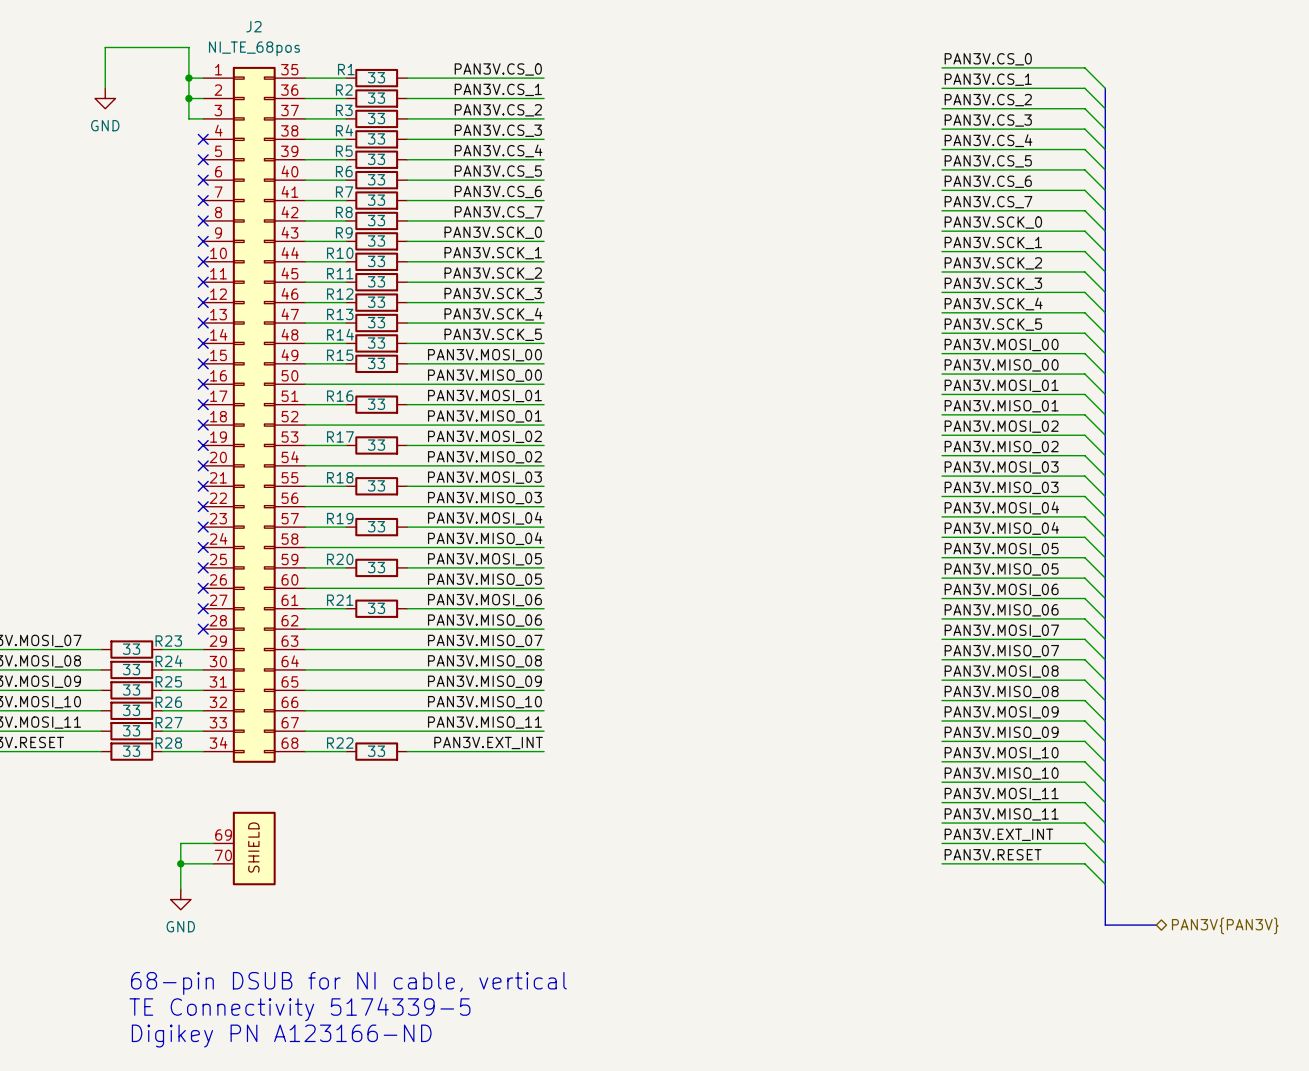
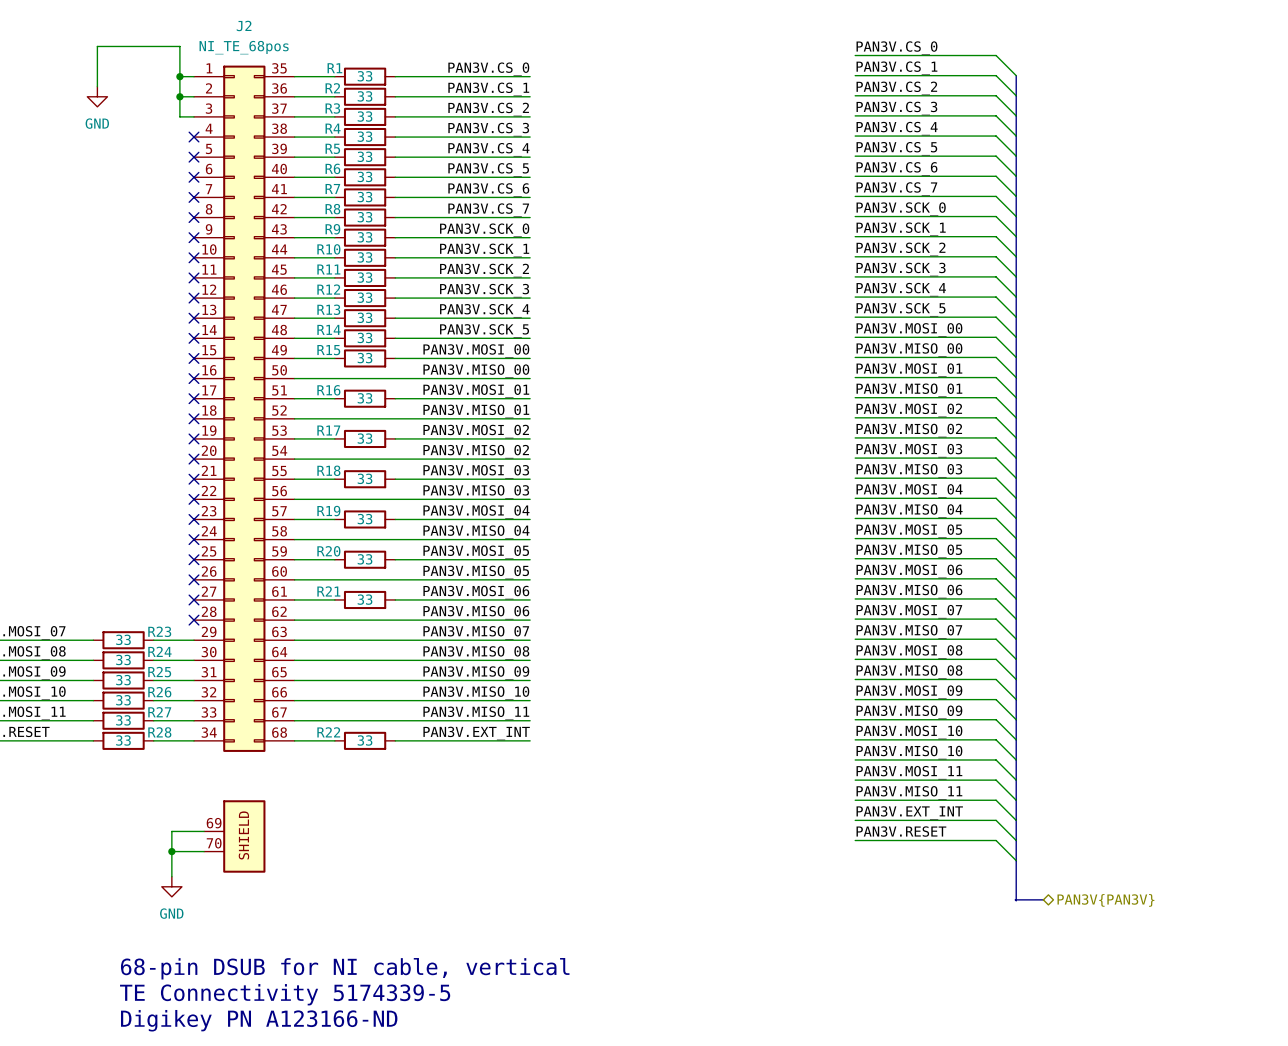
label position: PAN3V.CS_0 (988, 59) -> PAN3V.CS_0 (896, 48)
wire: (942, 67) (1084, 67) (1105, 88) -> (855, 55) (996, 55) (1016, 75)
bus: none -> (1016, 75) (1016, 900)
label position: PAN3V.CS_1 (988, 79) -> PAN3V.CS_1 (896, 68)
wire: (942, 88) (1084, 88) (1105, 108) -> (855, 75) (996, 75) (1016, 95)
bus: (1105, 88) (1105, 925) (1156, 925) -> none
label position: PAN3V.CS_2 (988, 100) -> PAN3V.CS_2 (896, 88)
wire: (942, 108) (1084, 108) (1105, 129) -> (855, 95) (996, 95) (1016, 115)
label position: PAN3V.CS_3 (988, 120) -> PAN3V.CS_3 (896, 108)
wire: (942, 129) (1084, 129) (1105, 149) -> (855, 115) (996, 115) (1016, 136)
label position: PAN3V.CS_4 (988, 140) -> PAN3V.CS_4 (897, 128)
wire: (942, 149) (1084, 149) (1105, 169) -> (855, 136) (996, 136) (1016, 156)
label position: PAN3V.CS_5 (988, 161) -> PAN3V.CS_5 (896, 148)
wire: (942, 169) (1084, 169) (1105, 190) -> (855, 156) (996, 156) (1016, 176)
label position: PAN3V.CS_6 (988, 181) -> PAN3V.CS_6 (896, 168)
wire: (942, 190) (1084, 190) (1105, 210) -> (855, 176) (996, 176) (1016, 196)
label position: PAN3V.CS_7 (988, 202) -> PAN3V.CS_7 (896, 188)
wire: (942, 210) (1084, 210) (1105, 231) -> (855, 196) (996, 196) (1016, 216)
label position: PAN3V.SCK_0 (993, 222) -> PAN3V.SCK_0 (901, 209)
wire: (942, 231) (1084, 231) (1105, 251) -> (855, 216) (996, 216) (1016, 236)
label position: PAN3V.SCK_1 (993, 242) -> PAN3V.SCK_1 (901, 229)
wire: (942, 251) (1084, 251) (1105, 271) -> (855, 236) (996, 236) (1016, 256)
label position: PAN3V.SCK_2 (993, 263) -> PAN3V.SCK_2 (900, 249)
wire: (942, 271) (1084, 271) (1105, 292) -> (855, 256) (996, 256) (1016, 276)
label position: PAN3V.SCK_3 (993, 283) -> PAN3V.SCK_3 (901, 269)
wire: (942, 292) (1084, 292) (1105, 312) -> (855, 276) (996, 276) (1016, 297)
label position: PAN3V.SCK_4 (993, 303) -> PAN3V.SCK_4 (901, 289)
wire: (942, 312) (1084, 312) (1105, 333) -> (855, 297) (996, 297) (1016, 317)
label position: PAN3V.SCK_5 (993, 324) -> PAN3V.SCK_5 (901, 309)
wire: (942, 333) (1084, 333) (1105, 353) -> (855, 317) (996, 317) (1016, 337)
label position: PAN3V.MOSI_00 (1001, 345) -> PAN3V.MOSI_00 (909, 329)
wire: (942, 353) (1084, 353) (1105, 374) -> (855, 337) (996, 337) (1016, 357)
label position: PAN3V.MISO_00 (1001, 365) -> PAN3V.MISO_00 (909, 349)
wire: (942, 374) (1084, 374) (1105, 394) -> (855, 357) (996, 357) (1016, 377)
label position: PAN3V.MOSI_01 (1001, 385) -> PAN3V.MOSI_01 (909, 370)
wire: (942, 394) (1084, 394) (1105, 414) -> (855, 377) (996, 377) (1016, 397)
label position: PAN3V.MISO_01 (1001, 406) -> PAN3V.MISO_01 (909, 390)
wire: (942, 414) (1084, 414) (1105, 435) -> (855, 397) (996, 397) (1016, 417)
label position: PAN3V.MOSI_02 (1001, 426) -> PAN3V.MOSI_02 (909, 410)
wire: (942, 435) (1084, 435) (1105, 455) -> (855, 417) (996, 417) (1016, 437)
label position: PAN3V.MISO_02 (1001, 447) -> PAN3V.MISO_02 (909, 430)
wire: (942, 455) (1084, 455) (1105, 476) -> (855, 437) (996, 437) (1016, 458)
label position: PAN3V.MOSI_03 (1001, 467) -> PAN3V.MOSI_03 (909, 450)
wire: (942, 476) (1084, 476) (1105, 496) -> (855, 458) (996, 458) (1016, 478)
label position: PAN3V.MISO_03 (1001, 487) -> PAN3V.MISO_03 (909, 470)
wire: (942, 496) (1084, 496) (1105, 516) -> (855, 478) (996, 478) (1016, 498)
label position: PAN3V.MOSI_04 (1001, 508) -> PAN3V.MOSI_04 (909, 490)
wire: (942, 516) (1084, 516) (1105, 537) -> (855, 498) (996, 498) (1016, 518)
label position: PAN3V.MISO_04 (1001, 528) -> PAN3V.MISO_04 (909, 511)
wire: (942, 537) (1084, 537) (1105, 557) -> (855, 518) (996, 518) (1016, 538)
label position: PAN3V.MOSI_05 (1001, 549) -> PAN3V.MOSI_05 (909, 531)
wire: (942, 557) (1084, 557) (1105, 578) -> (855, 538) (996, 538) (1016, 558)
label position: PAN3V.MISO_05 (1001, 569) -> PAN3V.MISO_05 (909, 551)
wire: (942, 578) (1084, 578) (1105, 598) -> (855, 558) (996, 558) (1016, 578)
label position: PAN3V.MOSI_06 (1001, 589) -> PAN3V.MOSI_06 (909, 571)
wire: (942, 598) (1084, 598) (1105, 618) -> (855, 578) (996, 578) (1016, 598)
label position: PAN3V.MISO_06 (1001, 610) -> PAN3V.MISO_06 (909, 591)
wire: (942, 618) (1084, 618) (1105, 639) -> (855, 598) (996, 598) (1016, 619)
label position: PAN3V.MOSI_07 (1001, 630) -> PAN3V.MOSI_07 (909, 611)
wire: (942, 639) (1084, 639) (1105, 659) -> (855, 619) (996, 619) (1016, 639)
label position: PAN3V.MISO_07 (1001, 651) -> PAN3V.MISO_07 (909, 631)
wire: (942, 659) (1084, 659) (1105, 680) -> (855, 639) (996, 639) (1016, 659)
label position: PAN3V.MOSI_08 (1001, 671) -> PAN3V.MOSI_08 (909, 651)
wire: (942, 680) (1084, 680) (1105, 700) -> (855, 659) (996, 659) (1016, 679)
label position: PAN3V.MISO_08 (1001, 691) -> PAN3V.MISO_08 (909, 672)
wire: (942, 700) (1084, 700) (1105, 720) -> (855, 679) (996, 679) (1016, 699)
label position: PAN3V.MOSI_09 (1001, 712) -> PAN3V.MOSI_09 (909, 692)
wire: (942, 720) (1084, 720) (1105, 741) -> (855, 699) (996, 699) (1016, 719)
label position: PAN3V.MISO_09 (1001, 732) -> PAN3V.MISO_09 (909, 712)
wire: (942, 741) (1084, 741) (1105, 761) -> (855, 719) (996, 719) (1016, 739)
label position: PAN3V.MOSI_10 (1001, 753) -> PAN3V.MOSI_10 (909, 732)
wire: (942, 761) (1084, 761) (1105, 782) -> (855, 739) (996, 739) (1016, 759)
label position: PAN3V.MISO_10 (1001, 773) -> PAN3V.MISO_10 (909, 752)
wire: (942, 782) (1084, 782) (1105, 802) -> (855, 759) (996, 759) (1016, 780)
label position: PAN3V.MOSI_11 (1001, 794) -> PAN3V.MOSI_11 (909, 772)
wire: (942, 802) (1084, 802) (1105, 823) -> (855, 780) (996, 780) (1016, 800)
label position: PAN3V.MISO_11 (1001, 814) -> PAN3V.MISO_11 (909, 792)
wire: (942, 823) (1084, 823) (1105, 843) -> (855, 800) (996, 800) (1016, 820)
label position: PAN3V.EXT_INT (998, 834) -> PAN3V.EXT_INT (909, 812)
wire: (942, 843) (1084, 843) (1105, 863) -> (855, 820) (996, 820) (1016, 840)
label position: PAN3V.RESET (993, 854) -> PAN3V.RESET (901, 831)
wire: (942, 863) (1084, 863) (1105, 884) -> (855, 840) (996, 840) (1016, 860)
bus: none -> (1015, 899) (1043, 899)
hierarchical label position: PAN3V{PAN3V} (1225, 925) -> PAN3V{PAN3V} (1105, 900)

